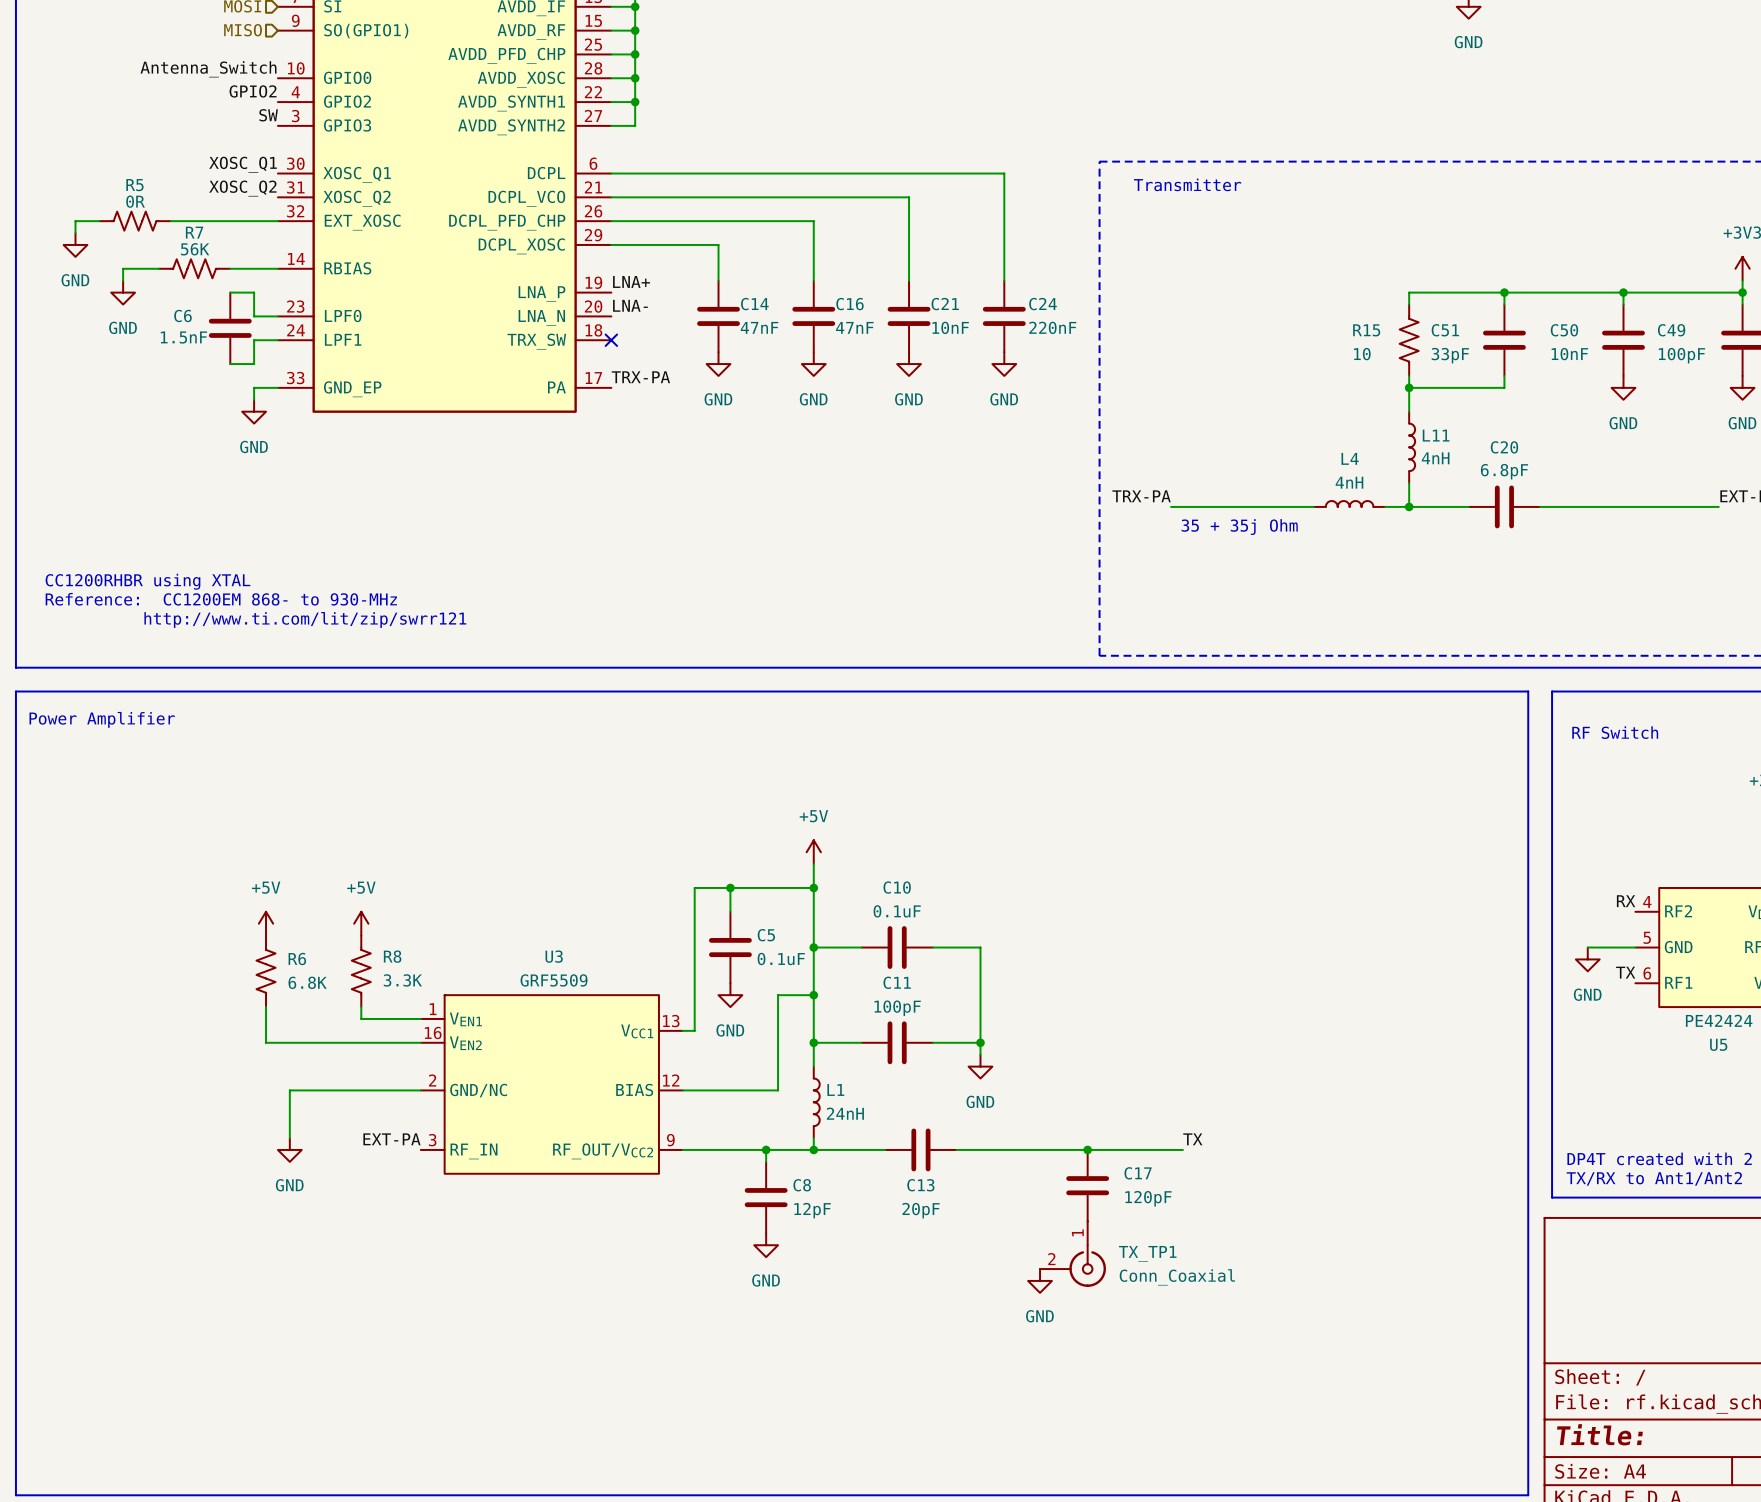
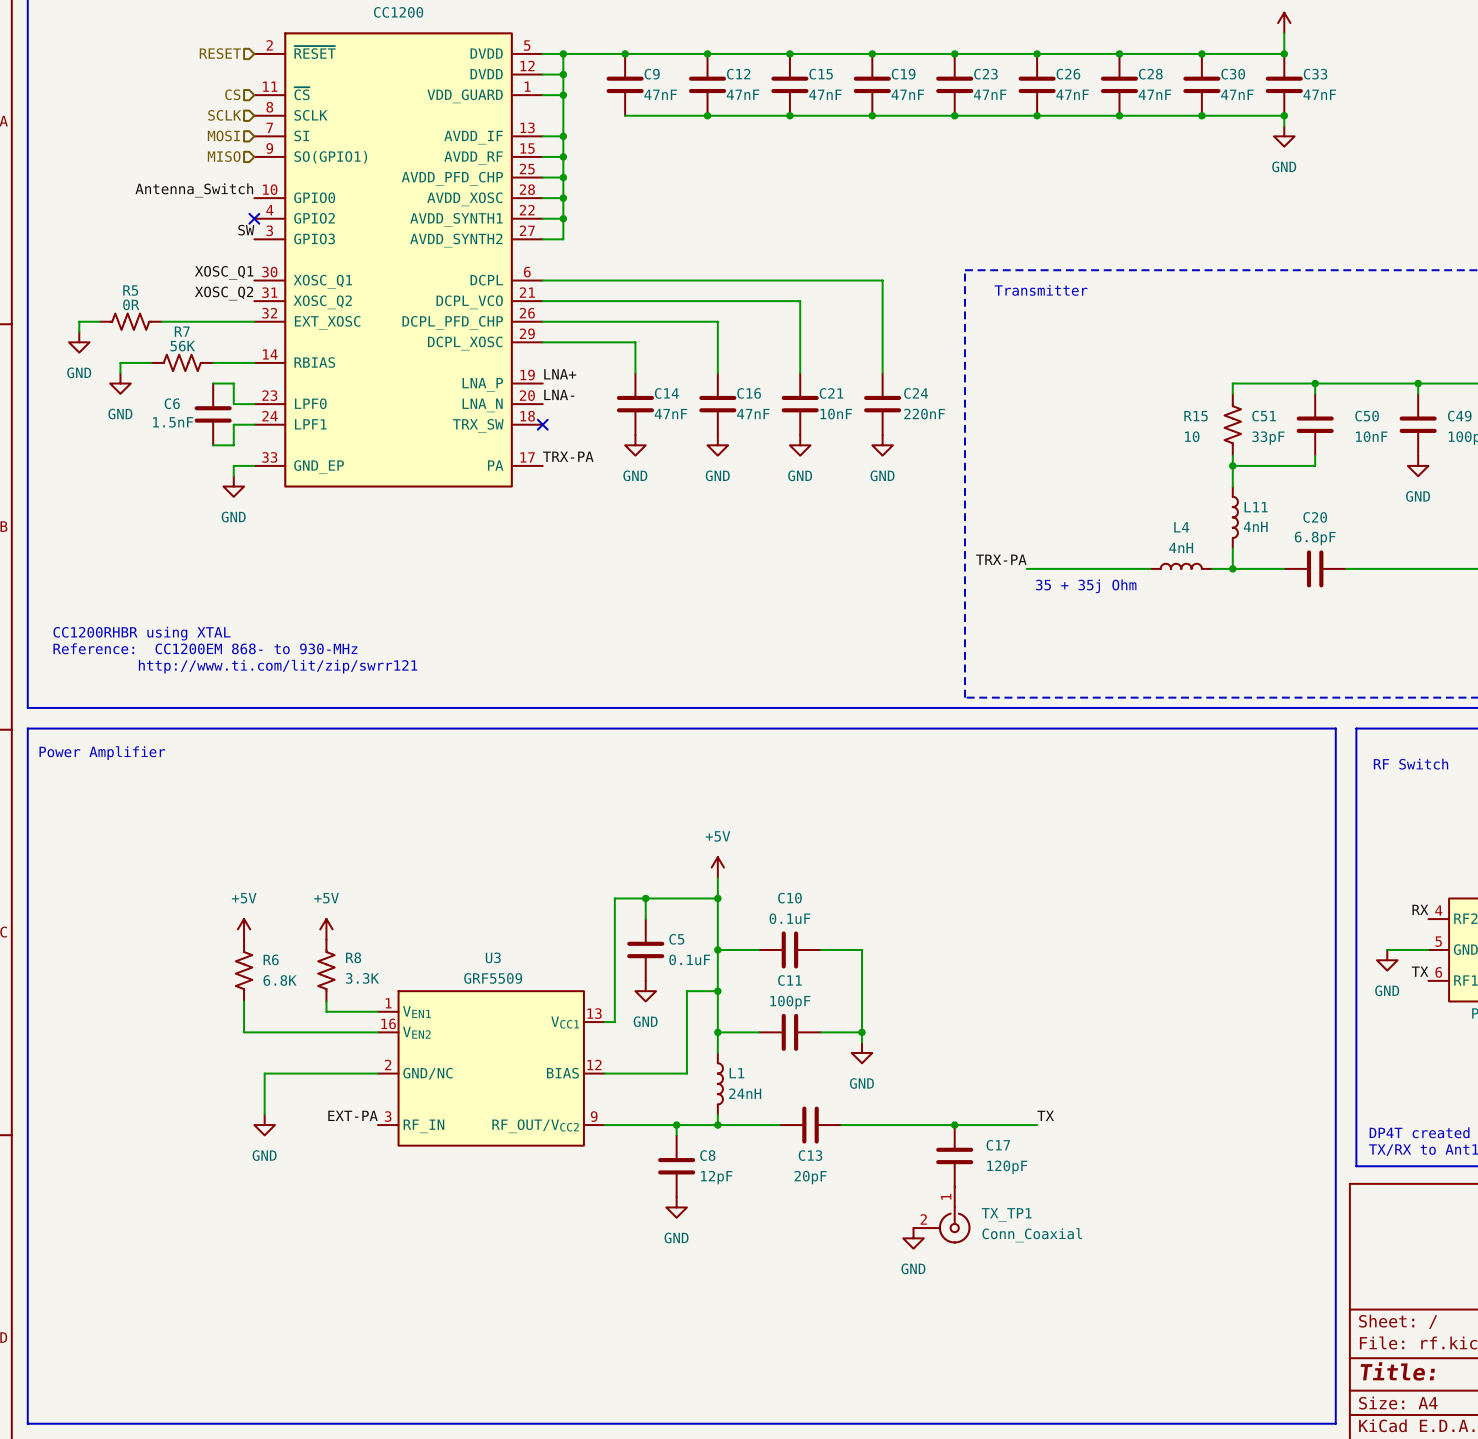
label: GPIO2 (253, 91) -> none
no-connect mark: none -> (254, 218)

